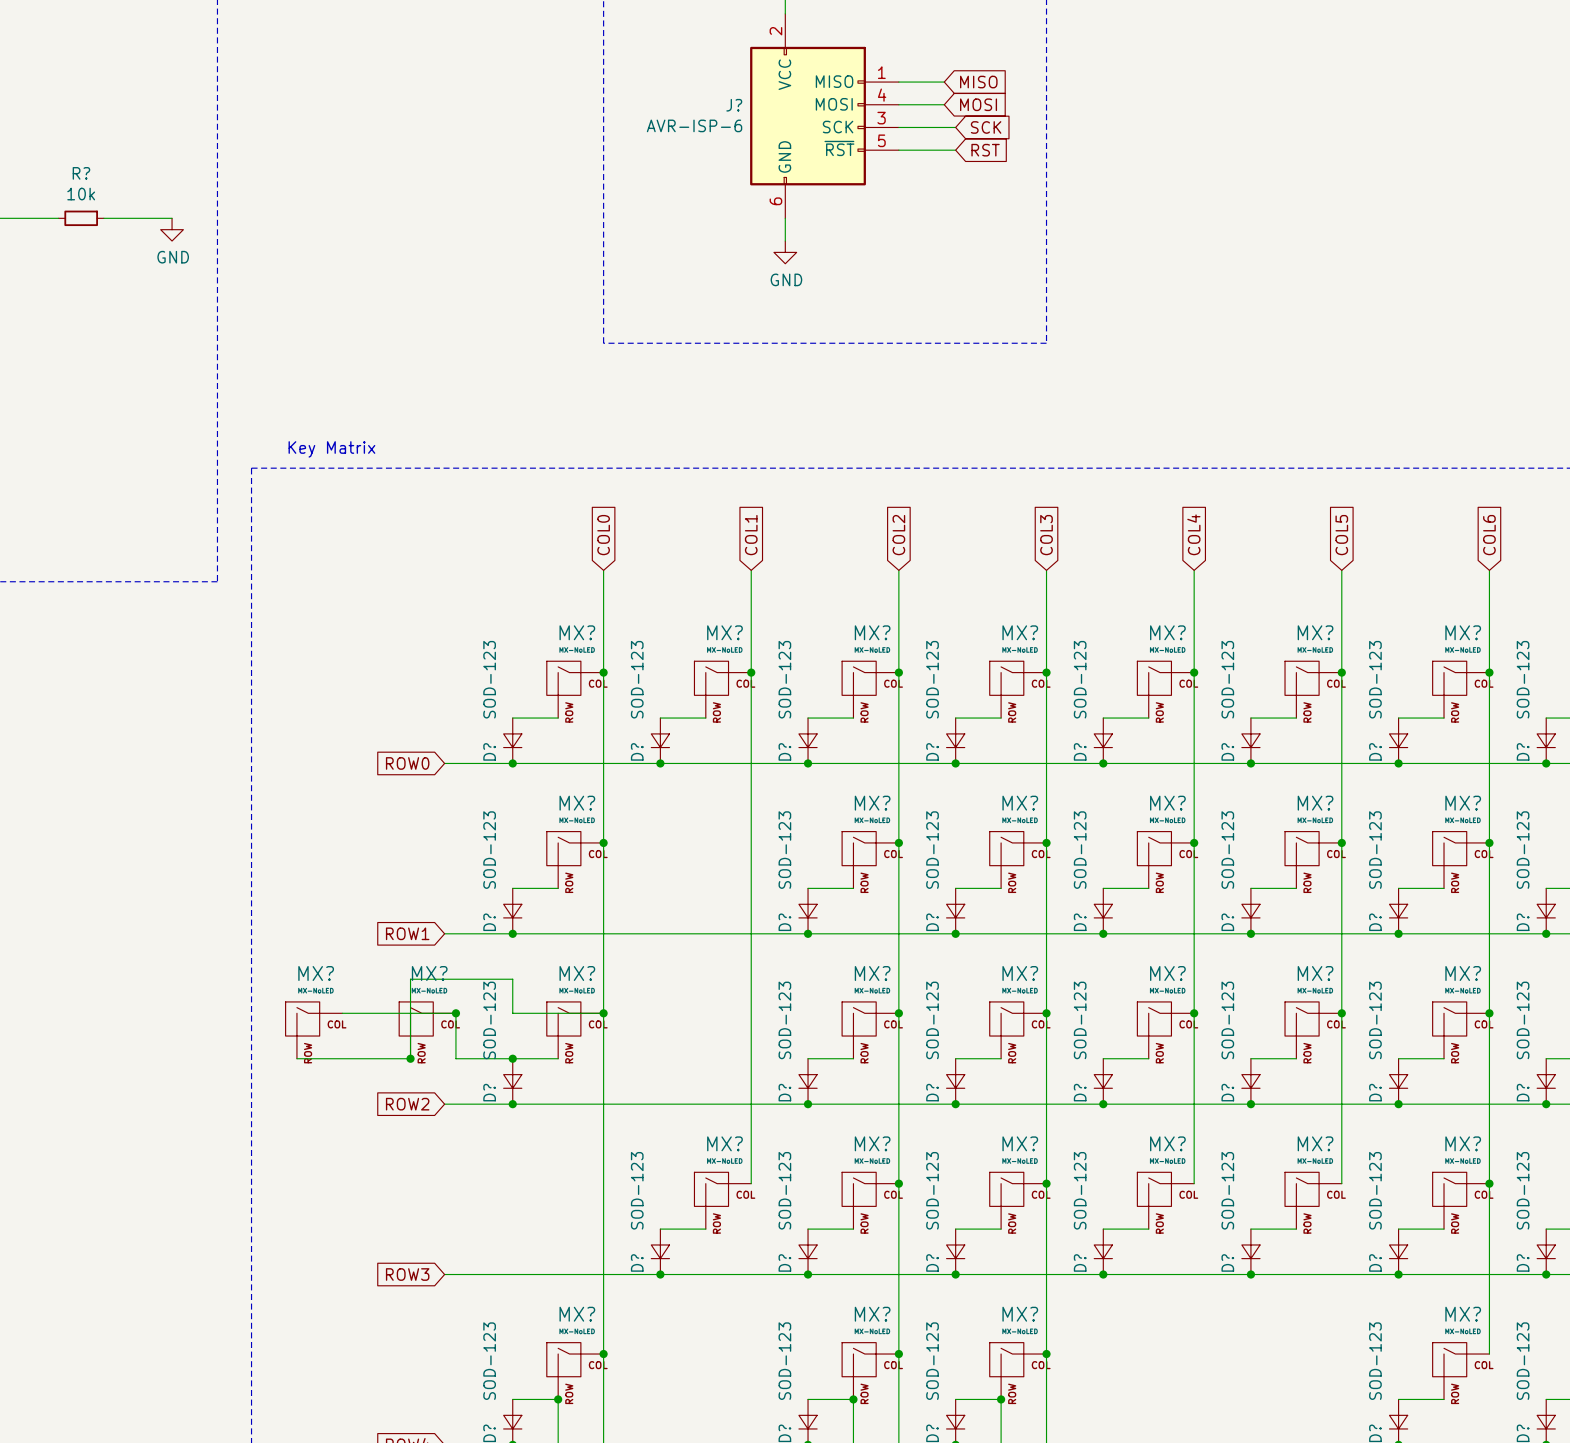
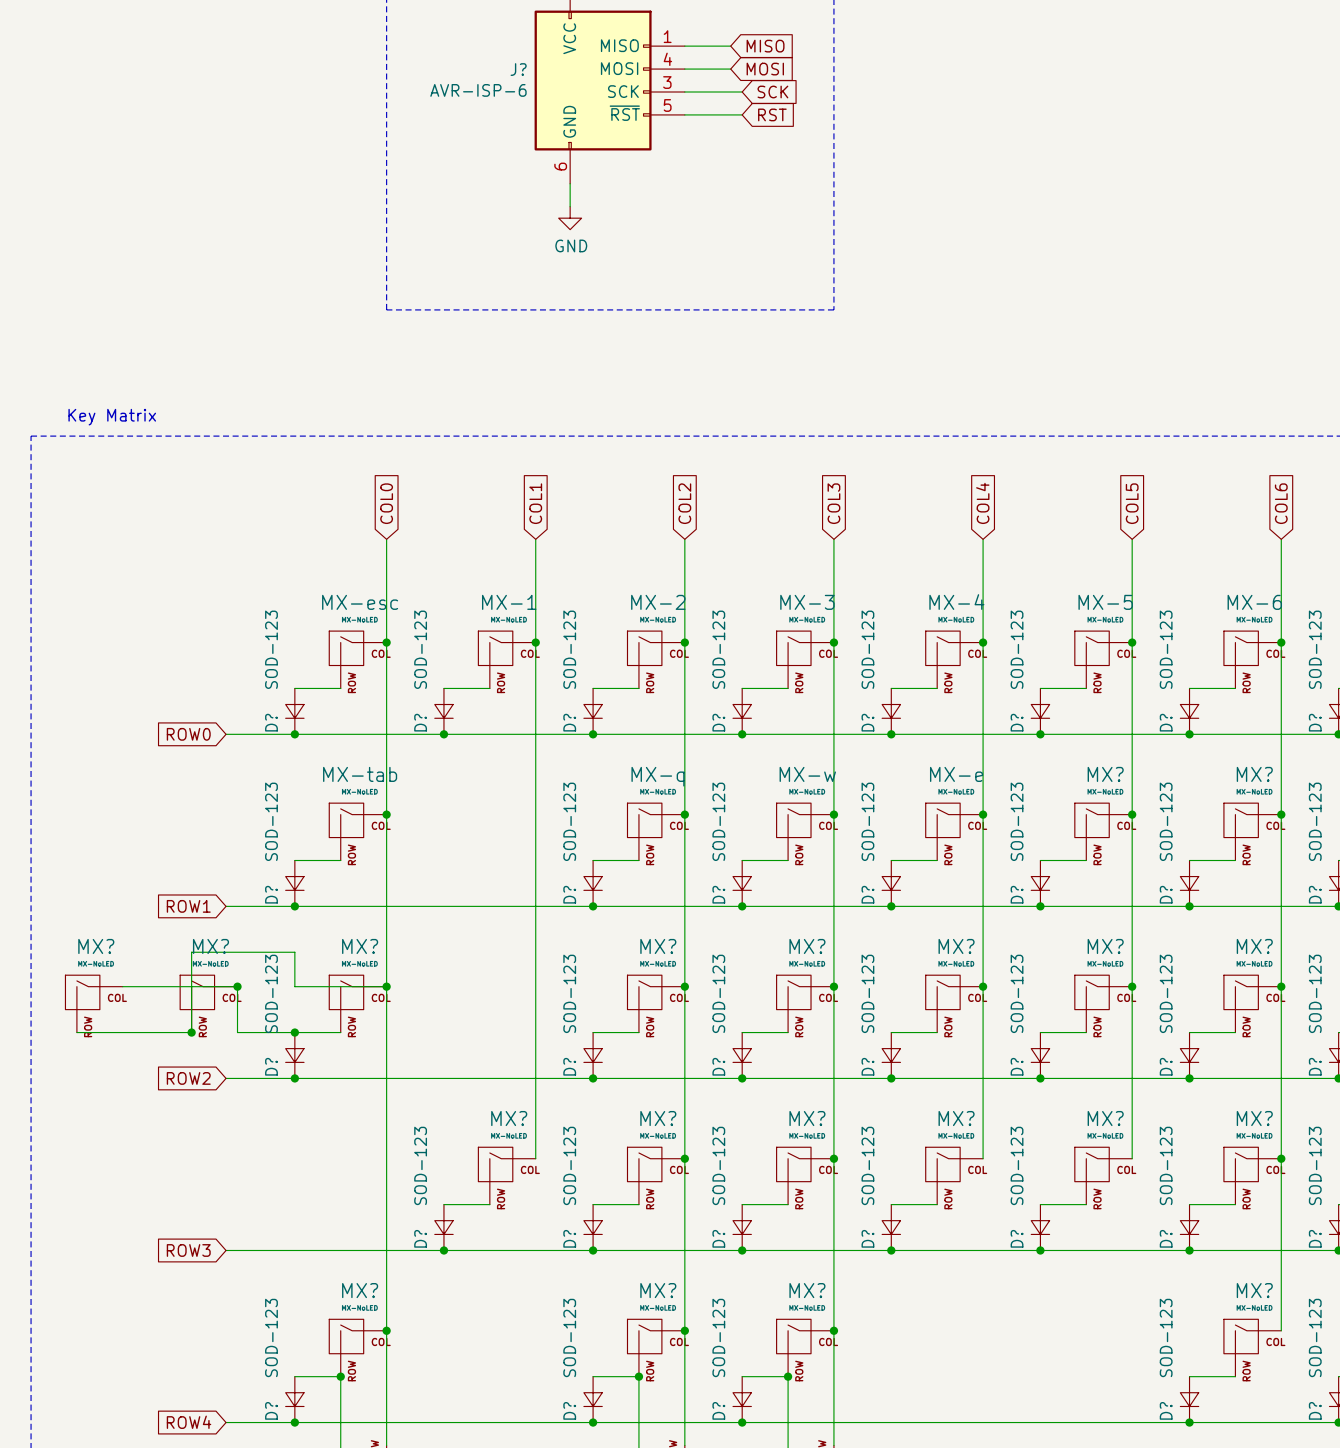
MX? name: MX? (577, 632) -> MX-esc (360, 602)
MX? name: MX? (724, 632) -> MX-1 (509, 602)
MX? name: MX? (872, 632) -> MX-2 (658, 602)
MX? name: MX? (1020, 632) -> MX-3 (807, 602)
MX? name: MX? (1167, 632) -> MX-4 (956, 602)
MX? name: MX? (1315, 632) -> MX-5 (1105, 602)
MX? name: MX? (1463, 632) -> MX-6 (1254, 602)
MX? name: MX? (577, 803) -> MX-tab (360, 774)
MX? name: MX? (872, 803) -> MX-q (658, 776)
MX? name: MX? (1020, 803) -> MX-w (807, 774)
MX? name: MX? (1167, 803) -> MX-e (956, 774)

